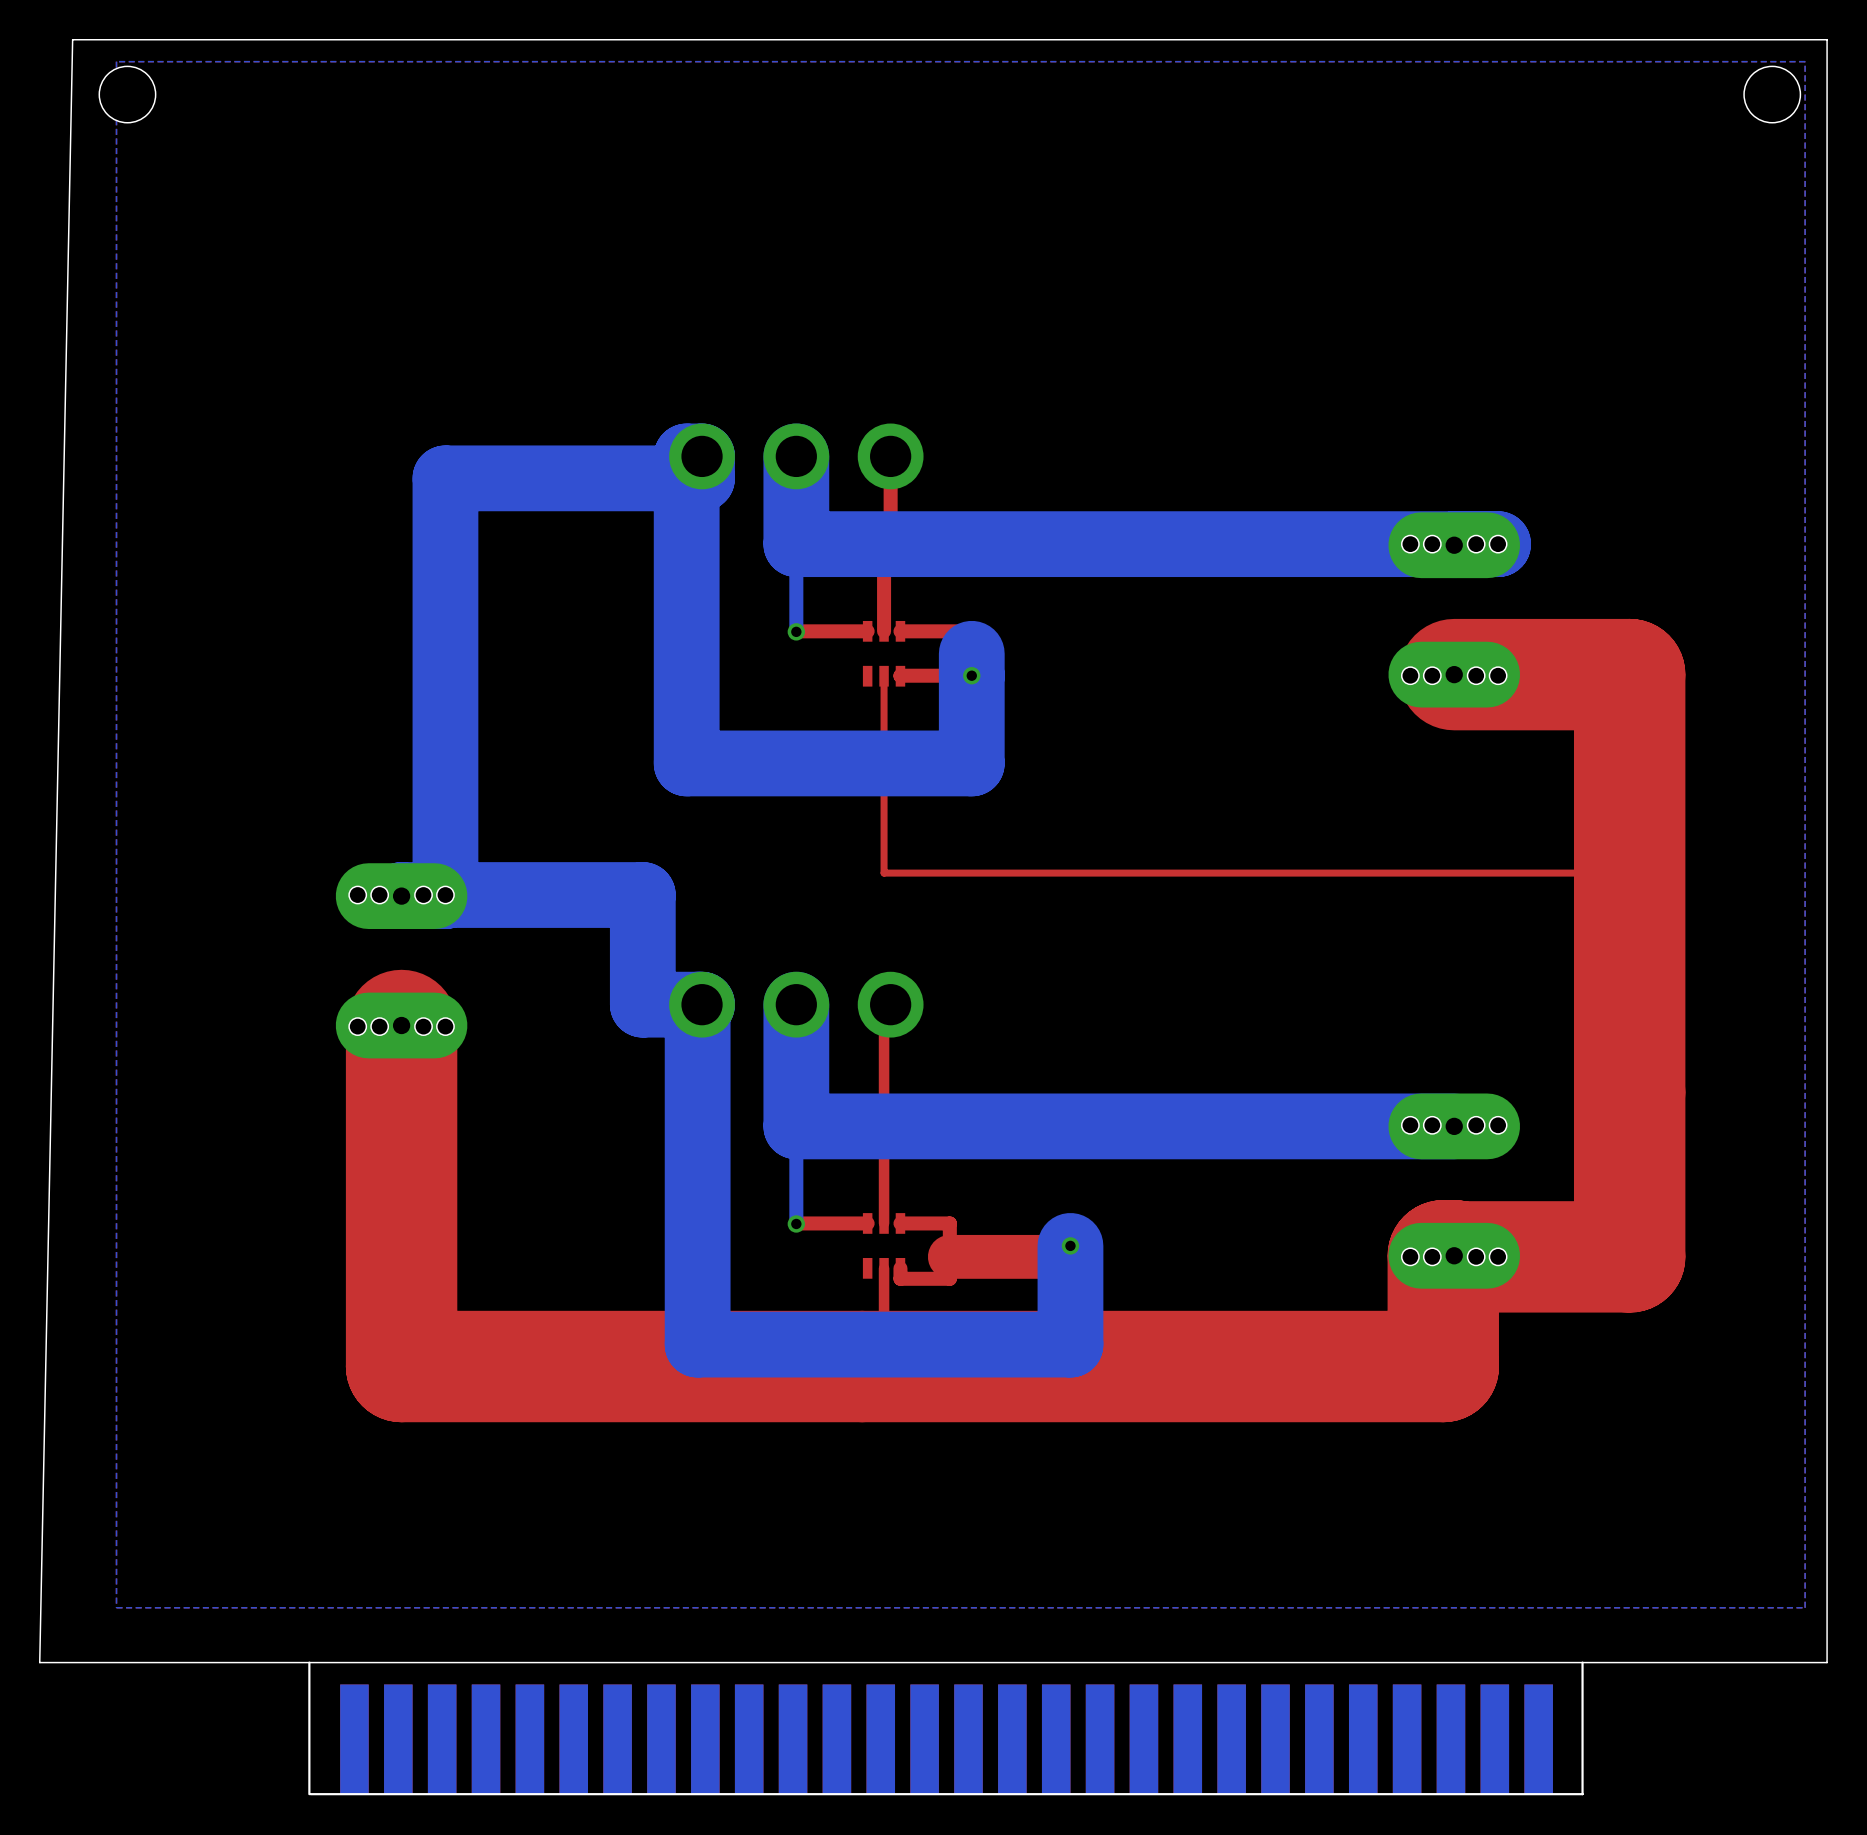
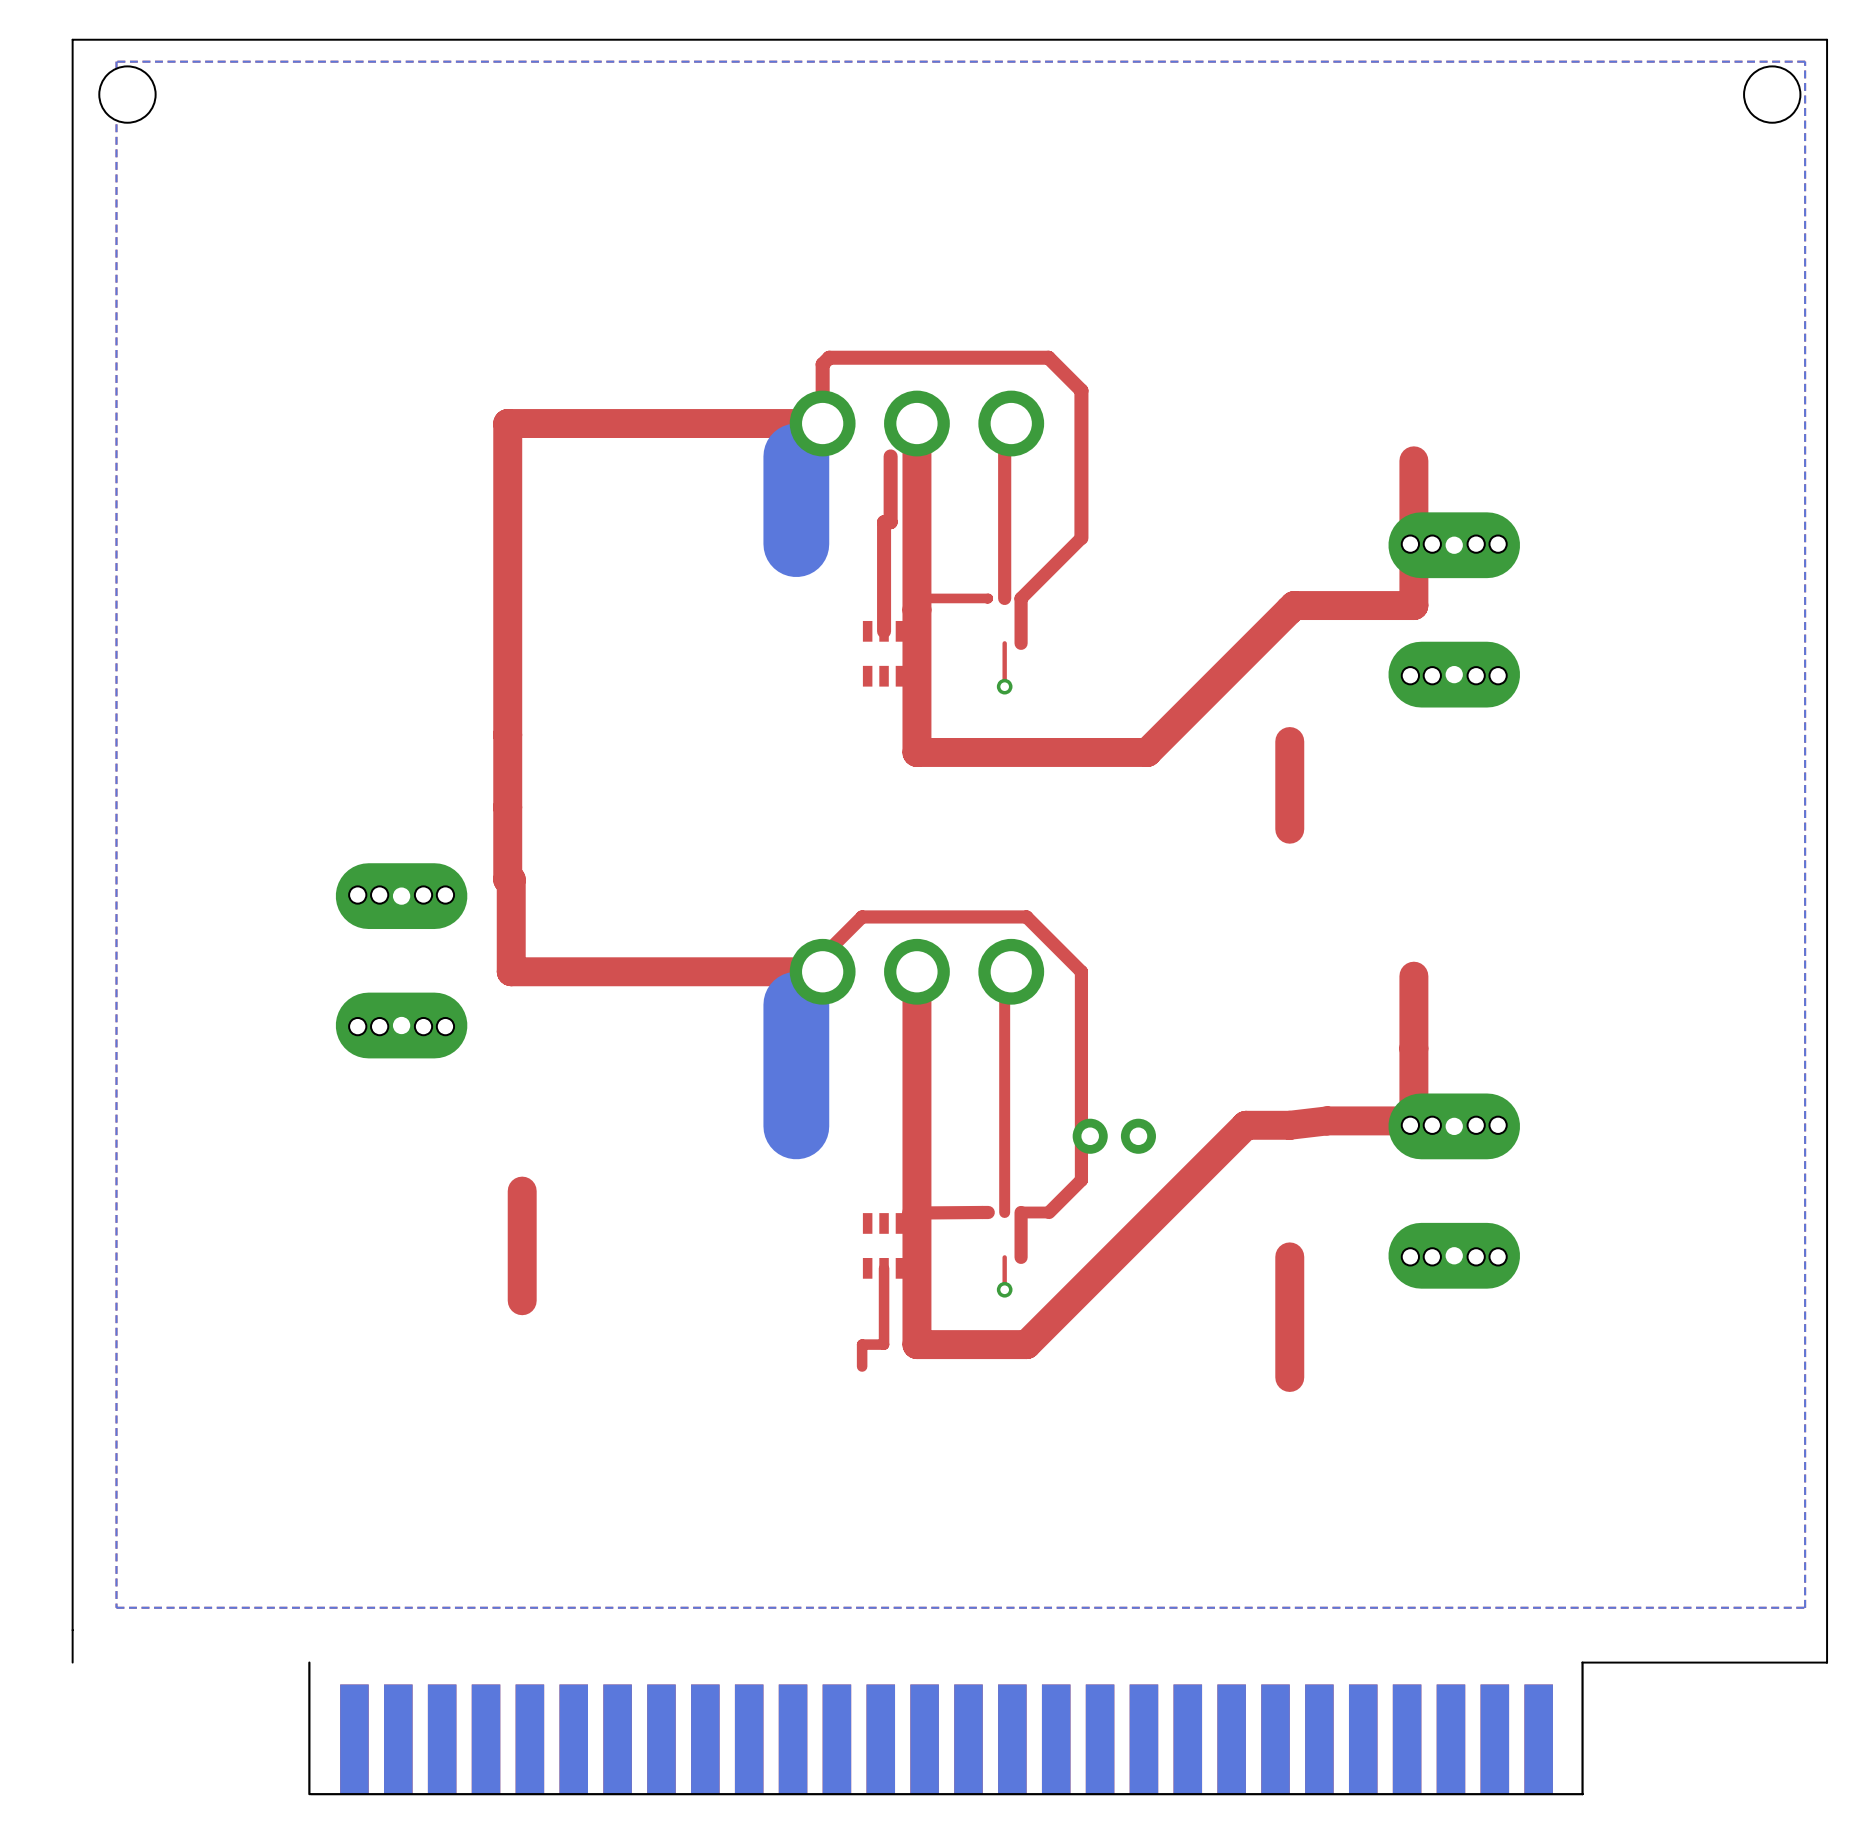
board edge: (72, 39) (39, 1662) (1582, 1662) -> (72, 39) (72, 1662)
top track: none -> (916, 423) (916, 752) (1147, 752) (1294, 605) (1413, 605) (1413, 460)
top track: none -> (1011, 423) (1004, 430) (1004, 598)
part position: (796, 456) -> (916, 423)
bottom track: (1498, 544) (796, 544) (796, 631) -> none
top track: none -> (987, 598) (916, 598) (916, 609)
via: (796, 631) -> none
top track: (867, 631) (796, 631) -> none
top track: (900, 631) (971, 631) (971, 675) (900, 676) -> none
top track: none -> (1004, 643) (1004, 686)
top track: none -> (1021, 643) (1021, 598) (1081, 538) (1081, 390) (1048, 357) (829, 357) (822, 364) (822, 423) (507, 423) (507, 879) (511, 879) (511, 971) (822, 971) (822, 956) (862, 916) (1026, 916) (1081, 971) (1081, 1180) (1049, 1212) (1021, 1212) (1021, 1257)
bottom track: (971, 653) (971, 763) (686, 763) (686, 456) (702, 456) (702, 478) (445, 478) (445, 896) (401, 896) (401, 895) (642, 895) (642, 1004) (702, 1004) -> none
top track: (1454, 674) (1629, 674) (1629, 1256) (1443, 1255) (1443, 1366) (401, 1366) (401, 1025) -> none
via: (971, 675) -> none
top track: (884, 676) (884, 873) (1607, 873) (1607, 851) (1629, 851) (1629, 1092) -> none
via: none -> (1004, 686)
top track: none -> (1289, 741) (1289, 829)
top track: none -> (916, 971) (916, 1344) (1026, 1344) (1245, 1125) (1289, 1125) (1327, 1120) (1413, 1120) (1413, 976)
top track: none -> (1011, 971) (1011, 976) (1004, 982) (1004, 1212)
bottom track: (697, 1004) (697, 1344) (1070, 1344) (1070, 1245) -> none
part position: (796, 1004) -> (916, 971)
top track: (890, 1004) (884, 1004) (884, 1223) -> none
bottom track: (1454, 1126) (796, 1126) (796, 1223) -> none
part: none -> (1114, 1136)
top track: none -> (522, 1191) (522, 1300)
top track: none -> (988, 1212) (916, 1213)
via: (796, 1223) -> none
top track: (867, 1223) (796, 1223) -> none
top track: (900, 1223) (949, 1223) (949, 1278) (900, 1278) (900, 1268) -> none
top track: (1070, 1245) (1070, 1256) (949, 1256) -> none
via: (1070, 1245) -> none
top track: none -> (1289, 1256) (1289, 1377)
top track: none -> (1004, 1257) (1004, 1289)
via: none -> (1004, 1289)

